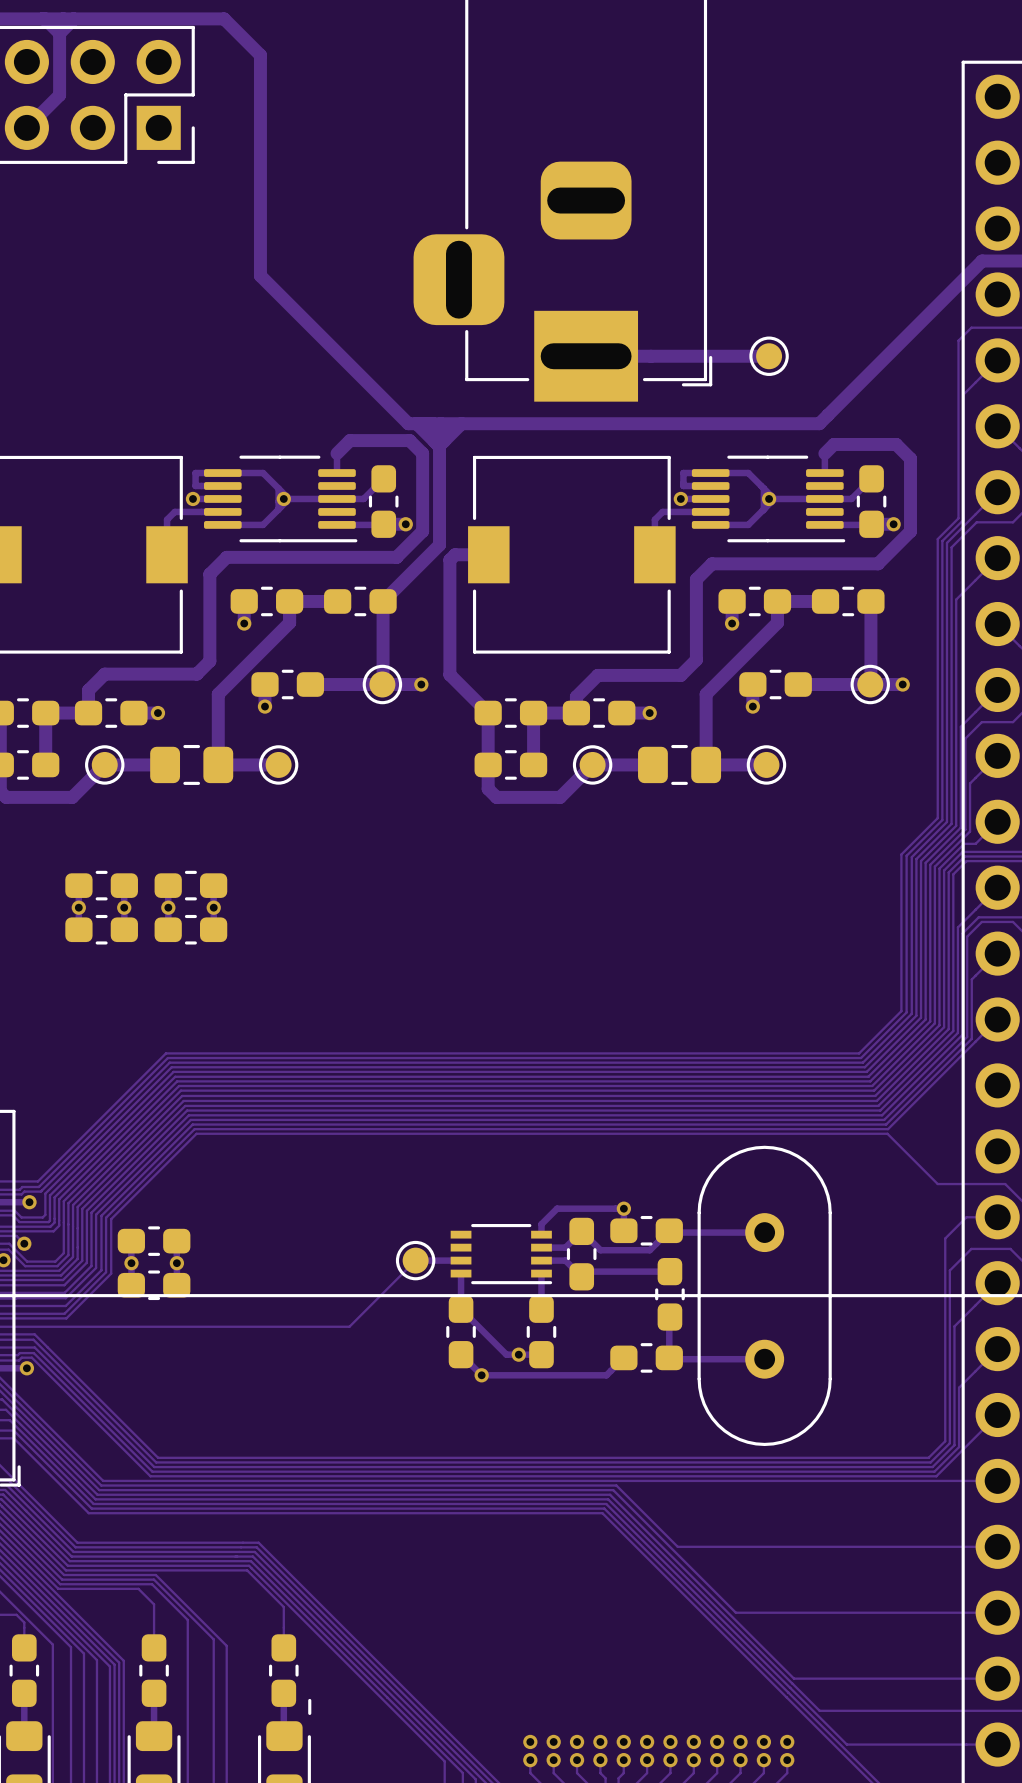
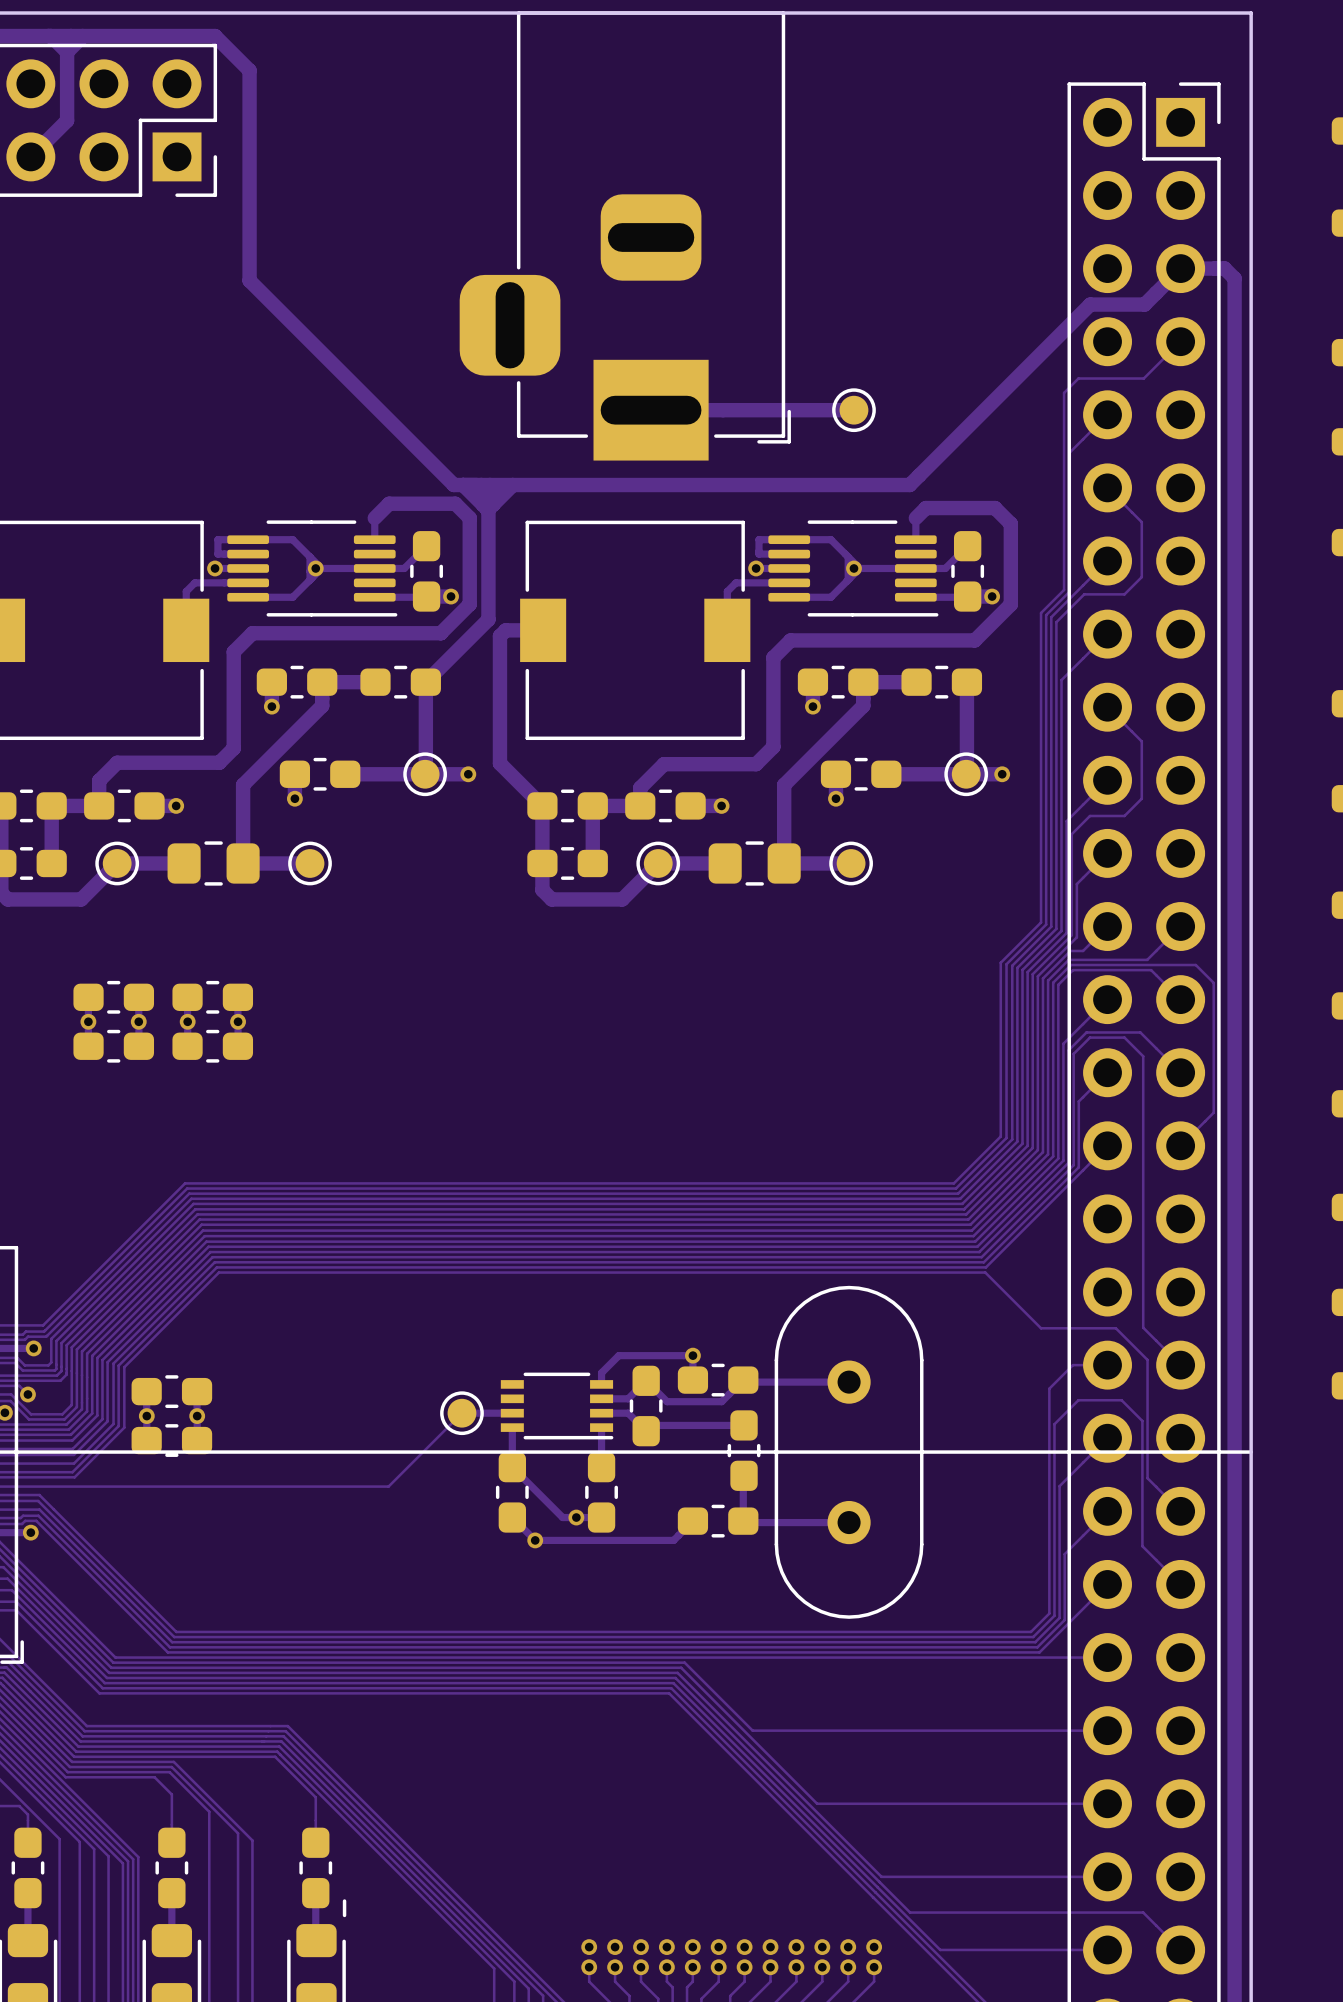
track: (192, 18) (224, 18) (260, 55) (260, 275) -> (215, 36) (249, 70) (249, 280) (289, 320)

